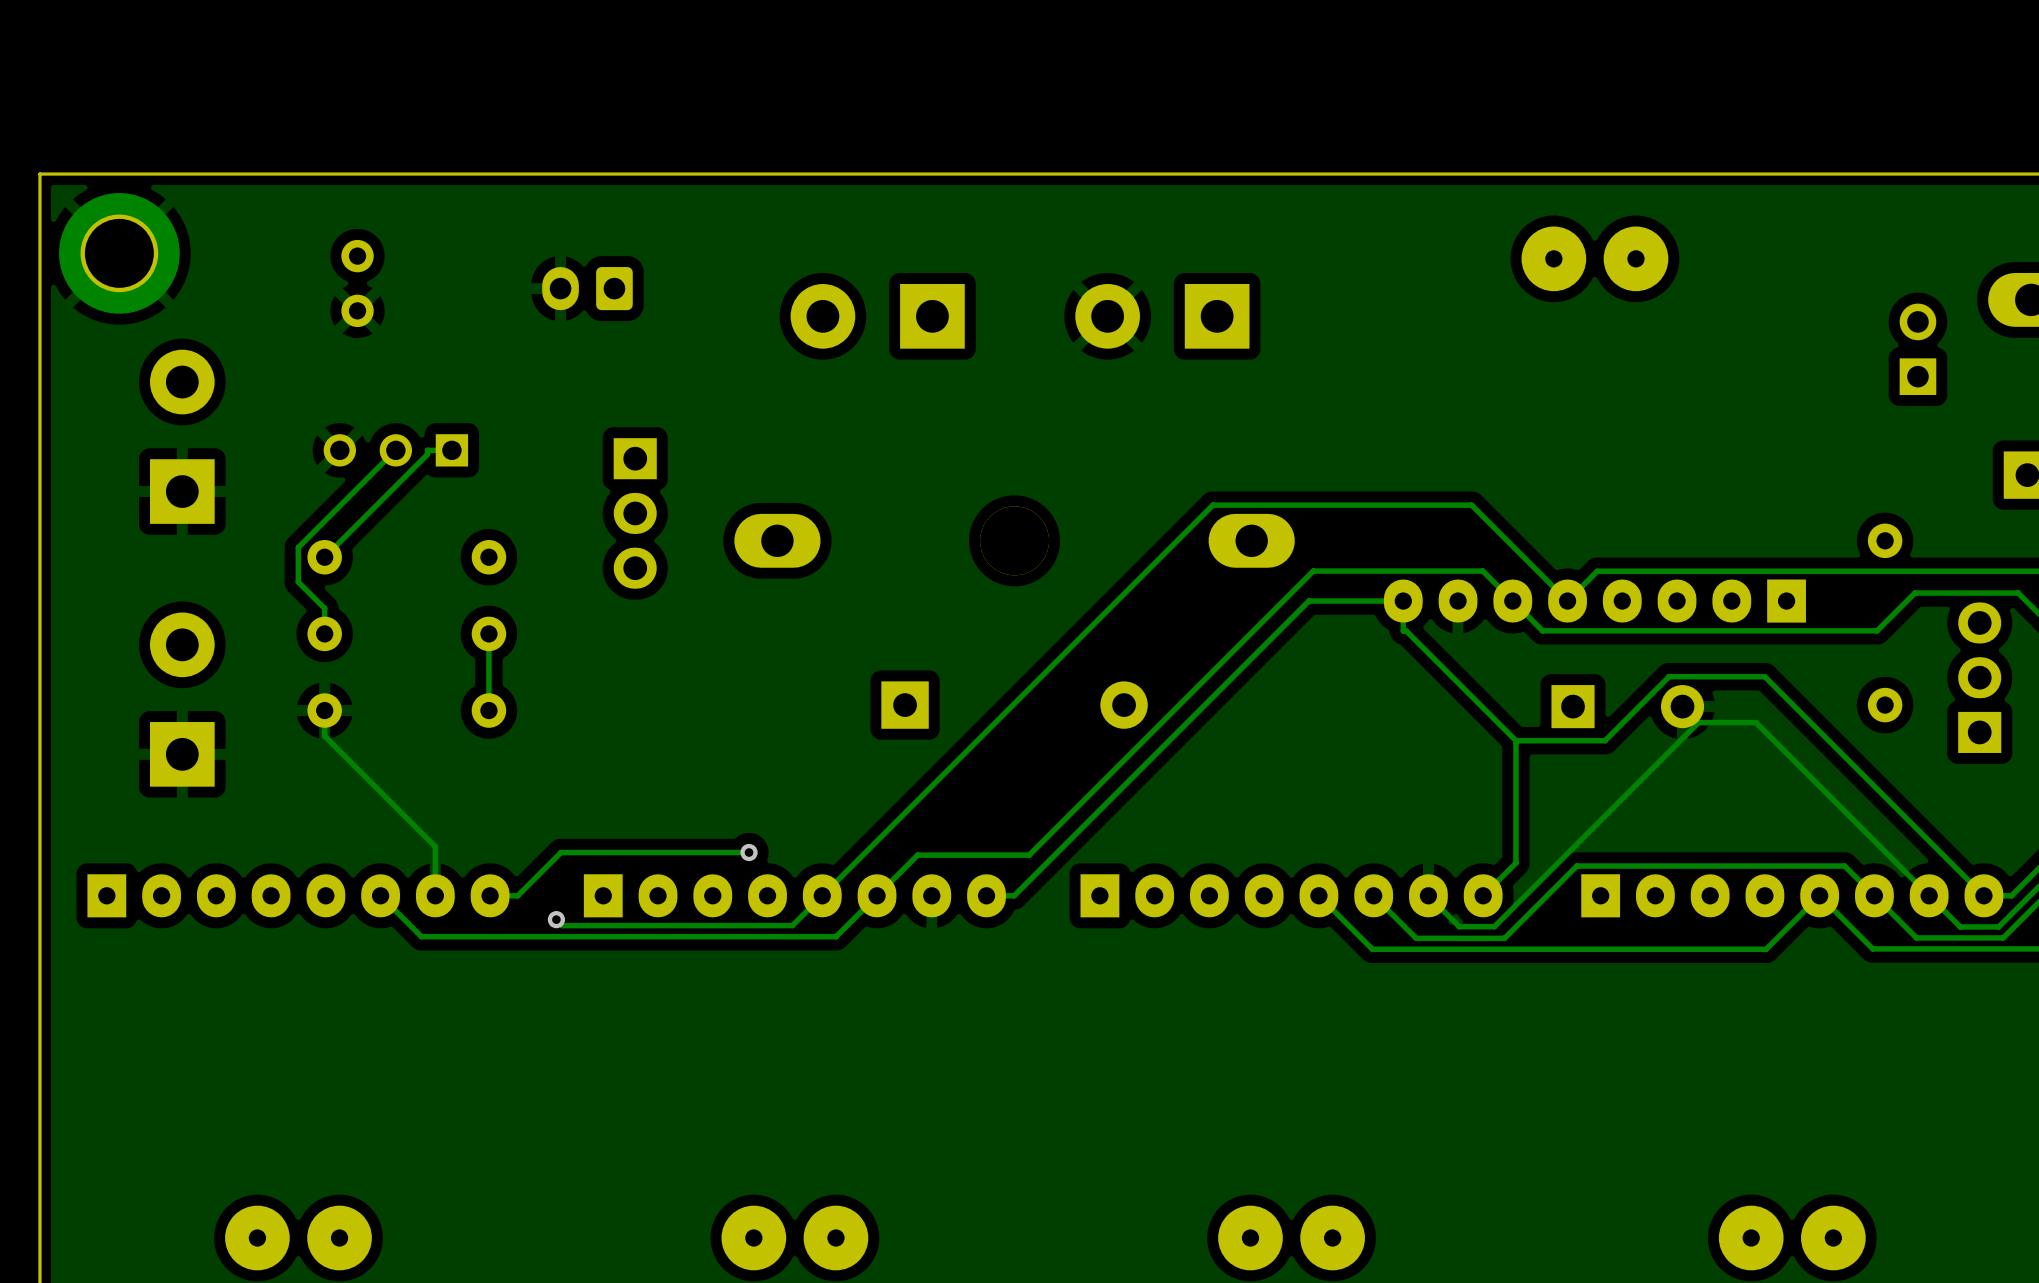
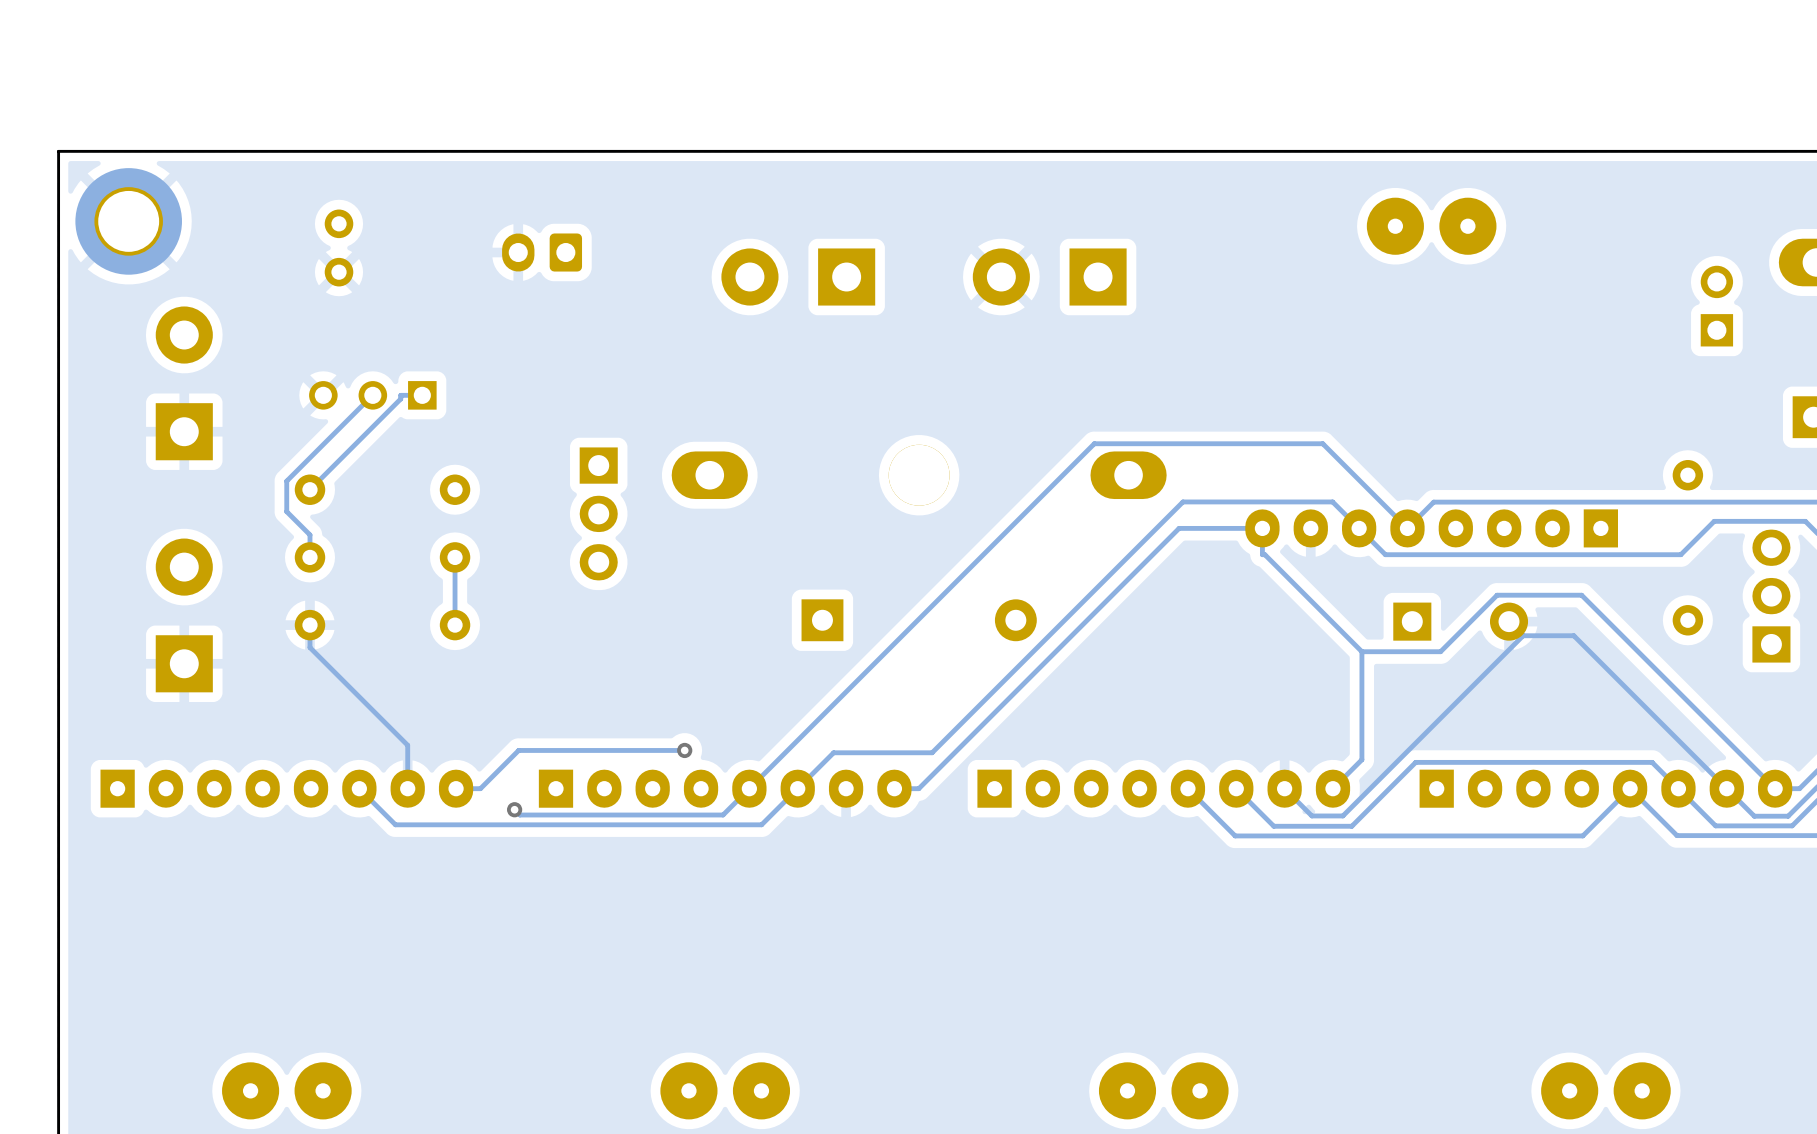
part position: (635, 513) -> (598, 513)

